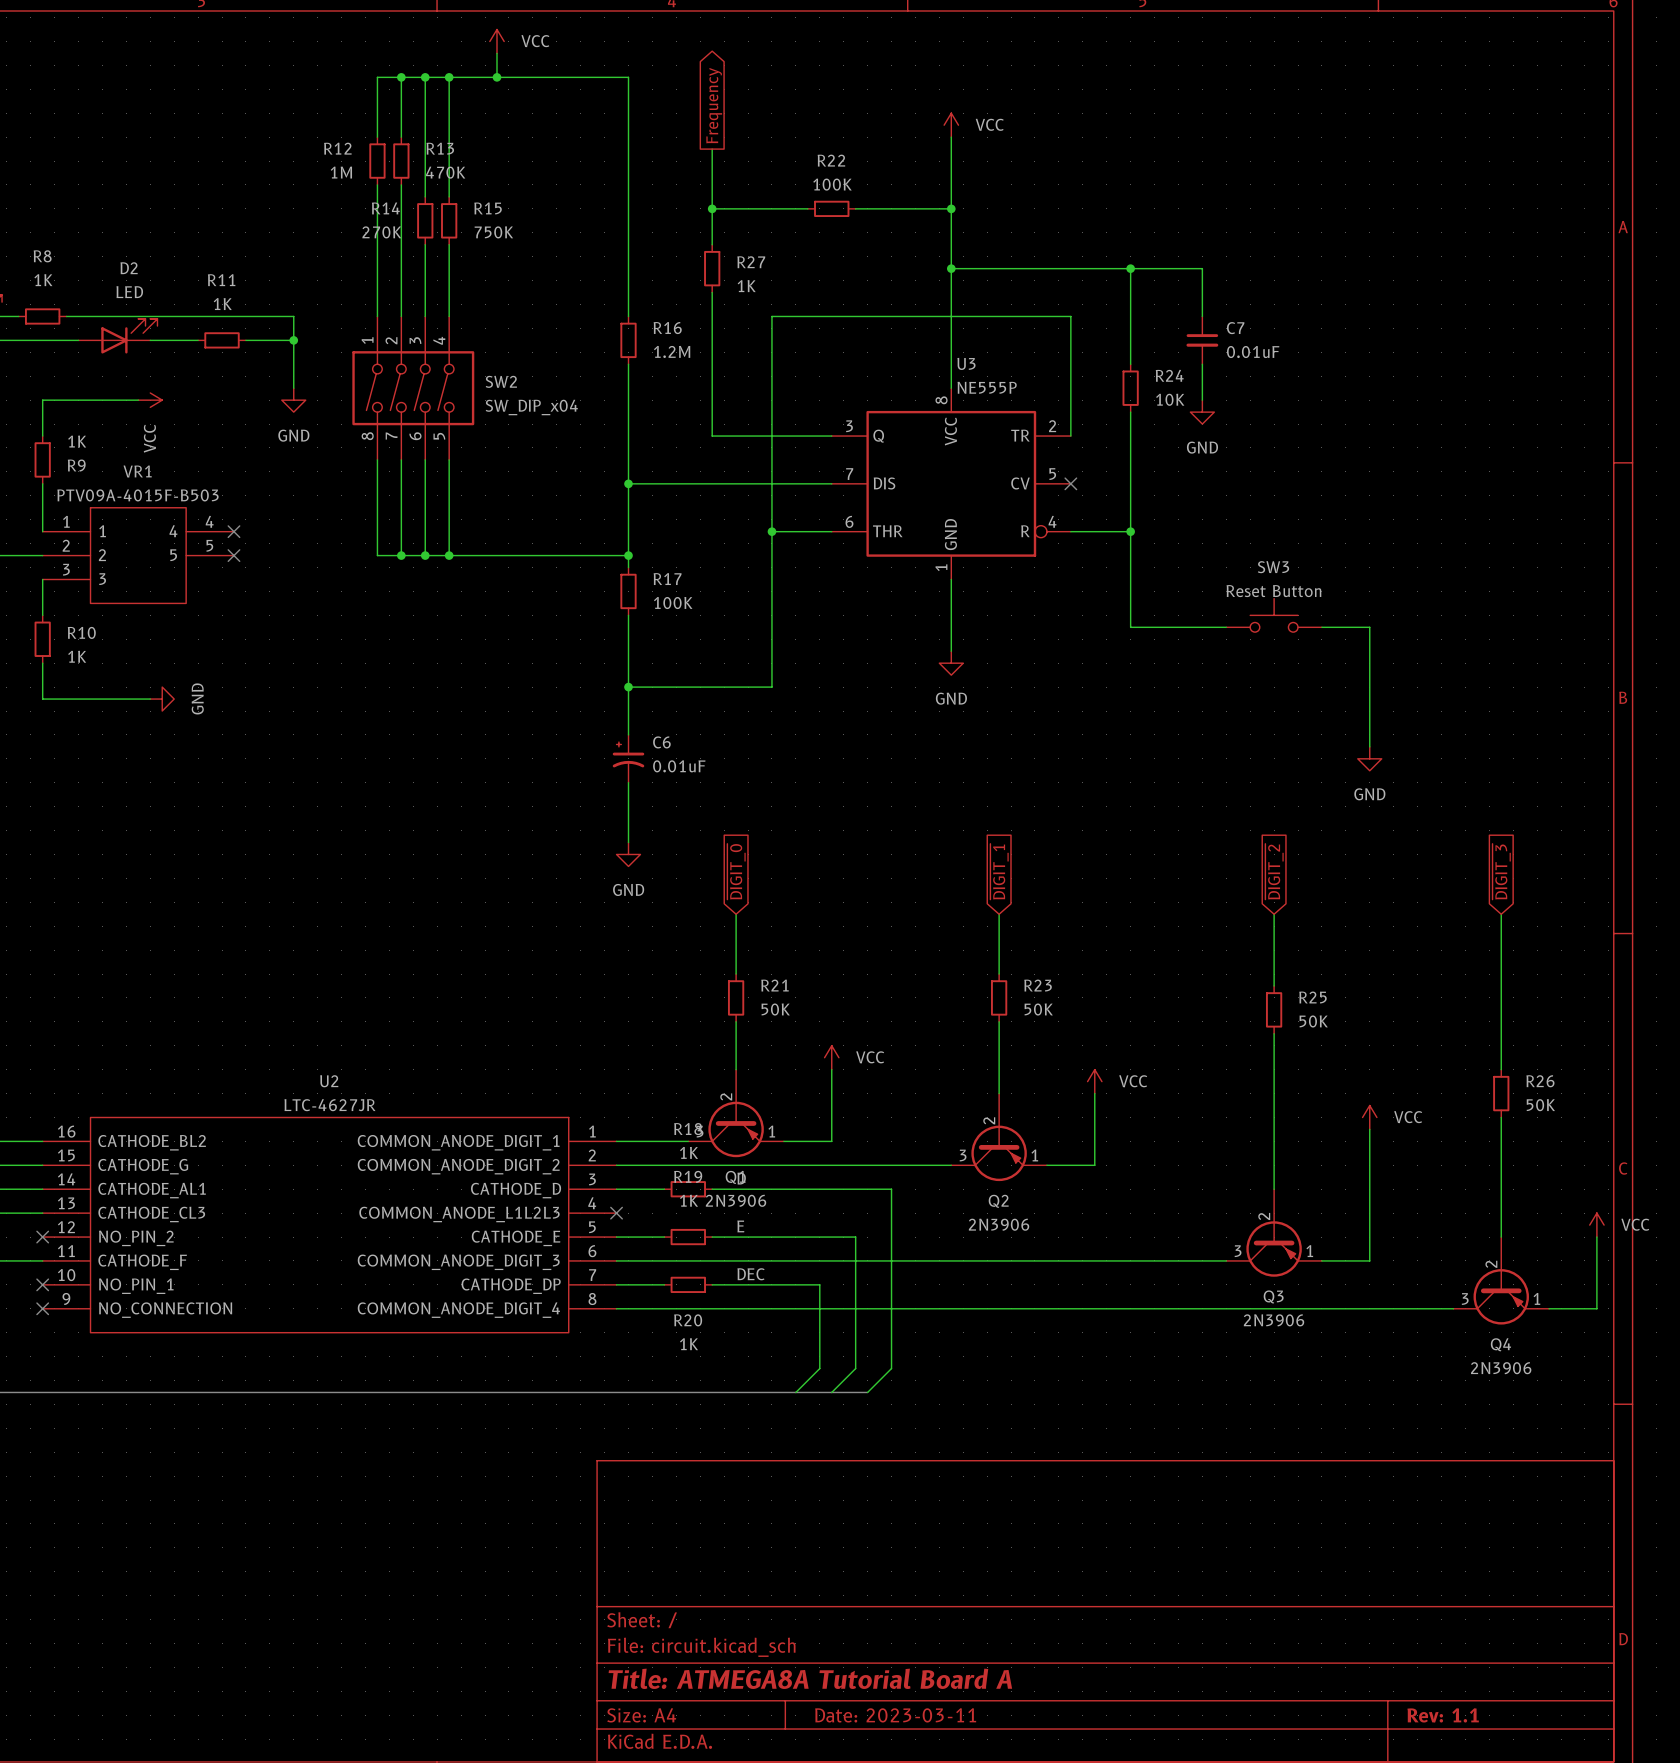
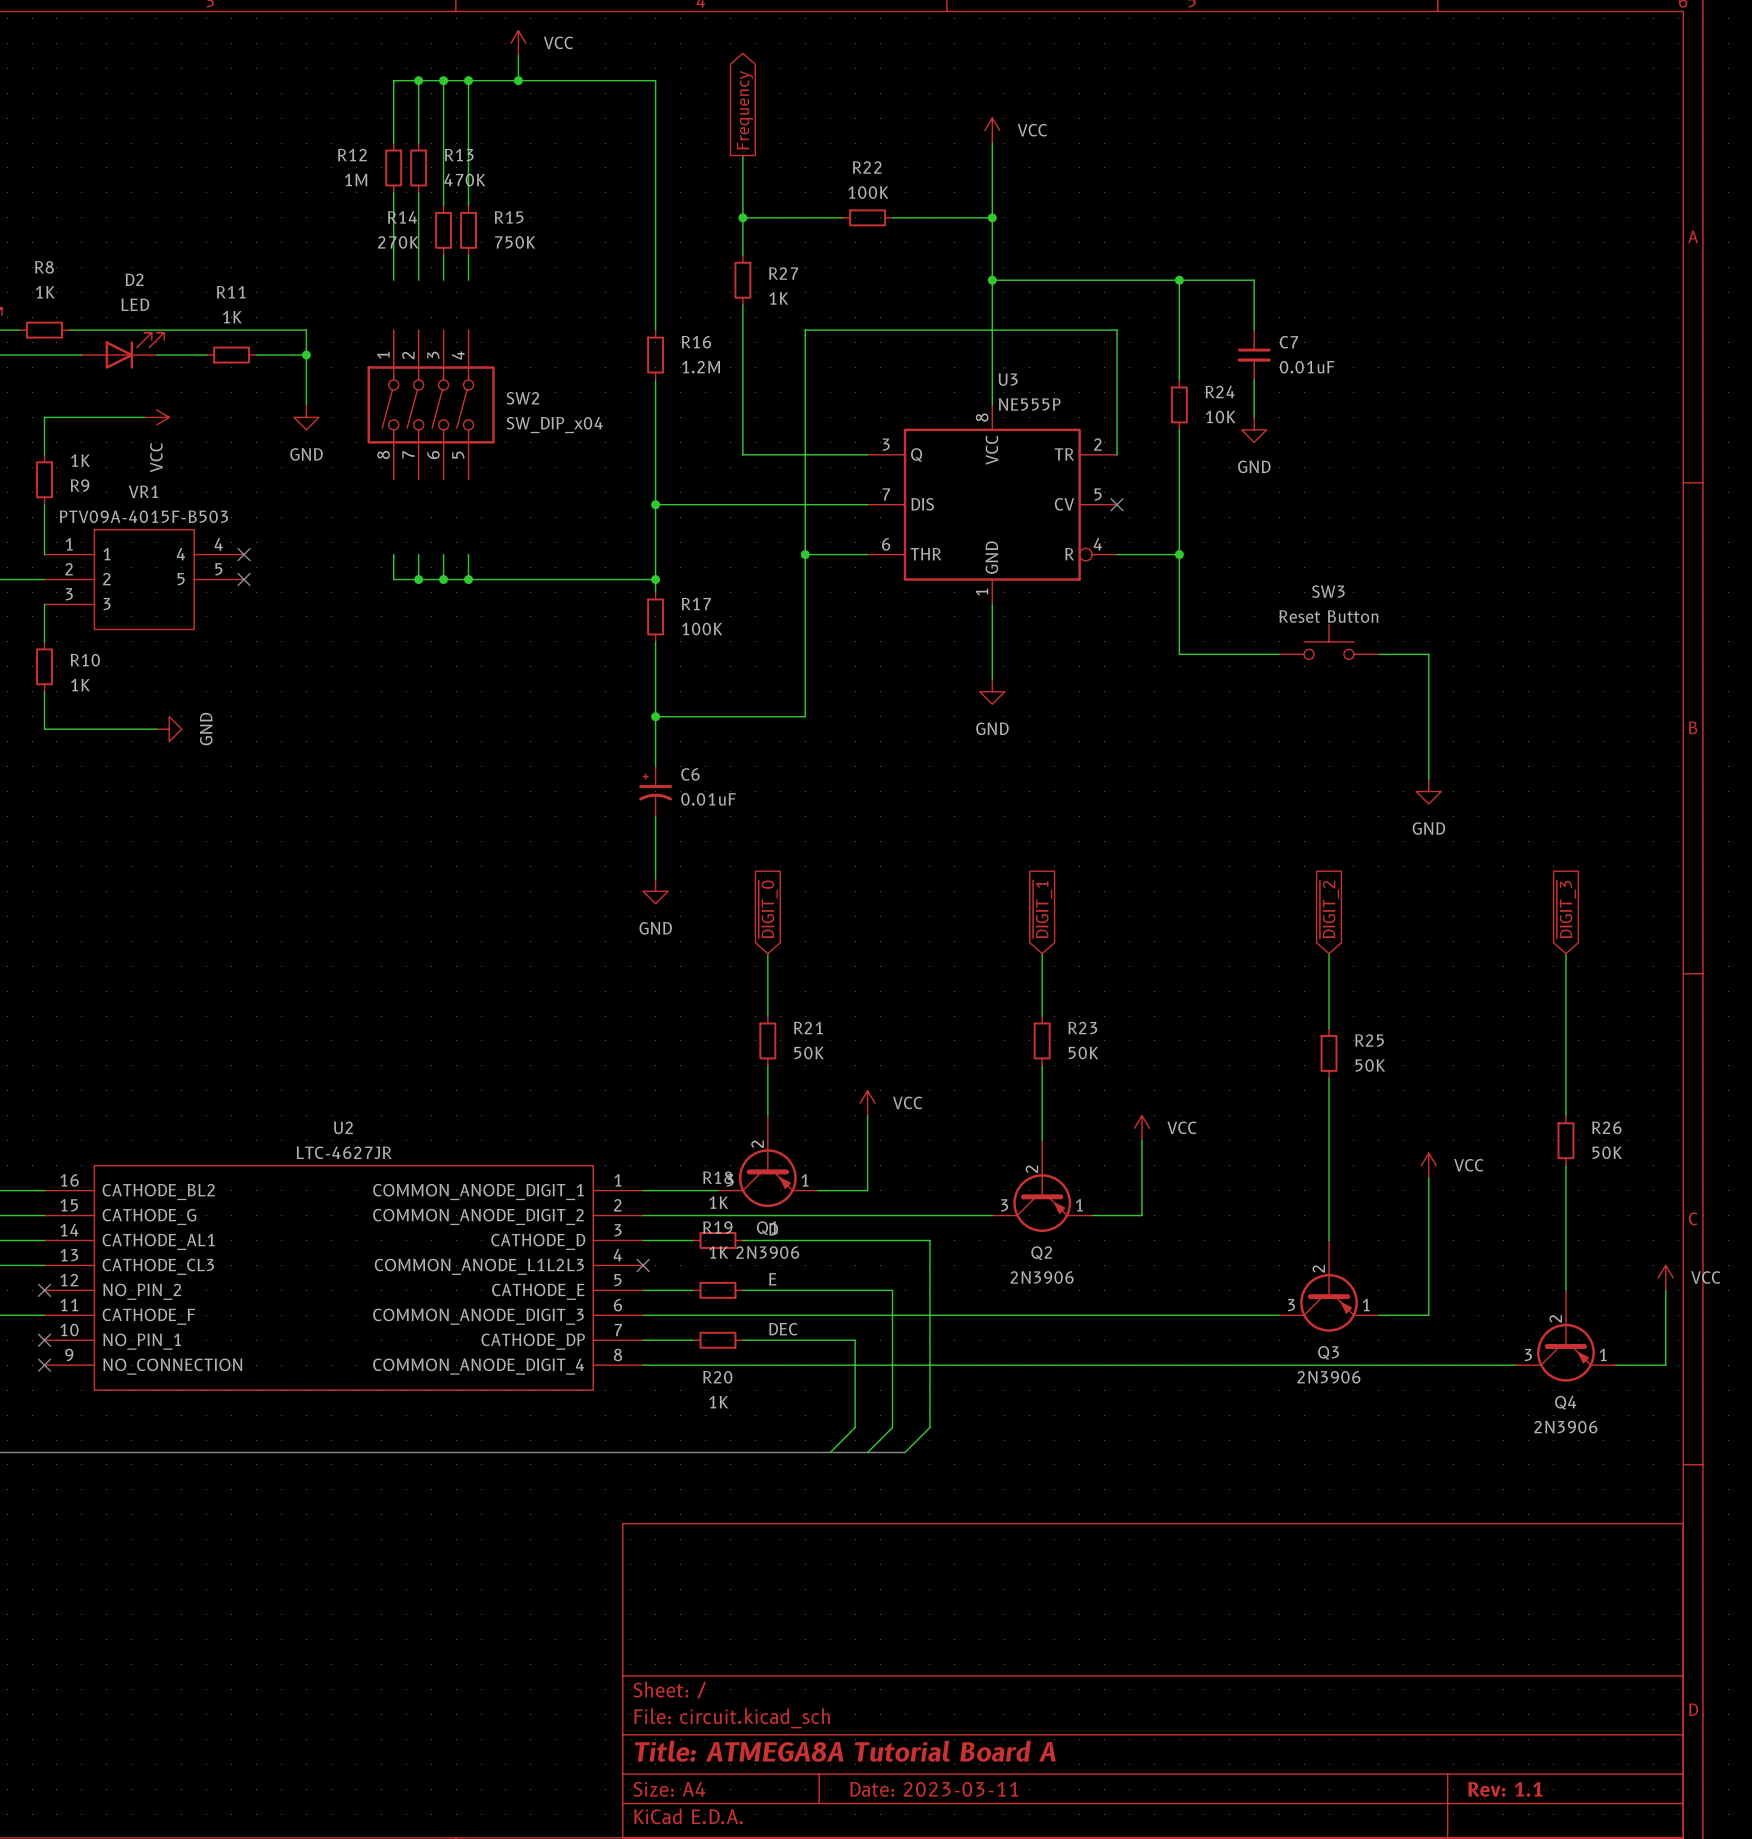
wire: (377, 268) (377, 316) -> none
wire: (401, 268) (401, 316) -> none
wire: (425, 268) (425, 316) -> none
wire: (449, 268) (449, 316) -> none
wire: (377, 459) (377, 531) -> none
wire: (401, 459) (401, 531) -> none
wire: (425, 459) (425, 531) -> none
wire: (449, 459) (449, 531) -> none

